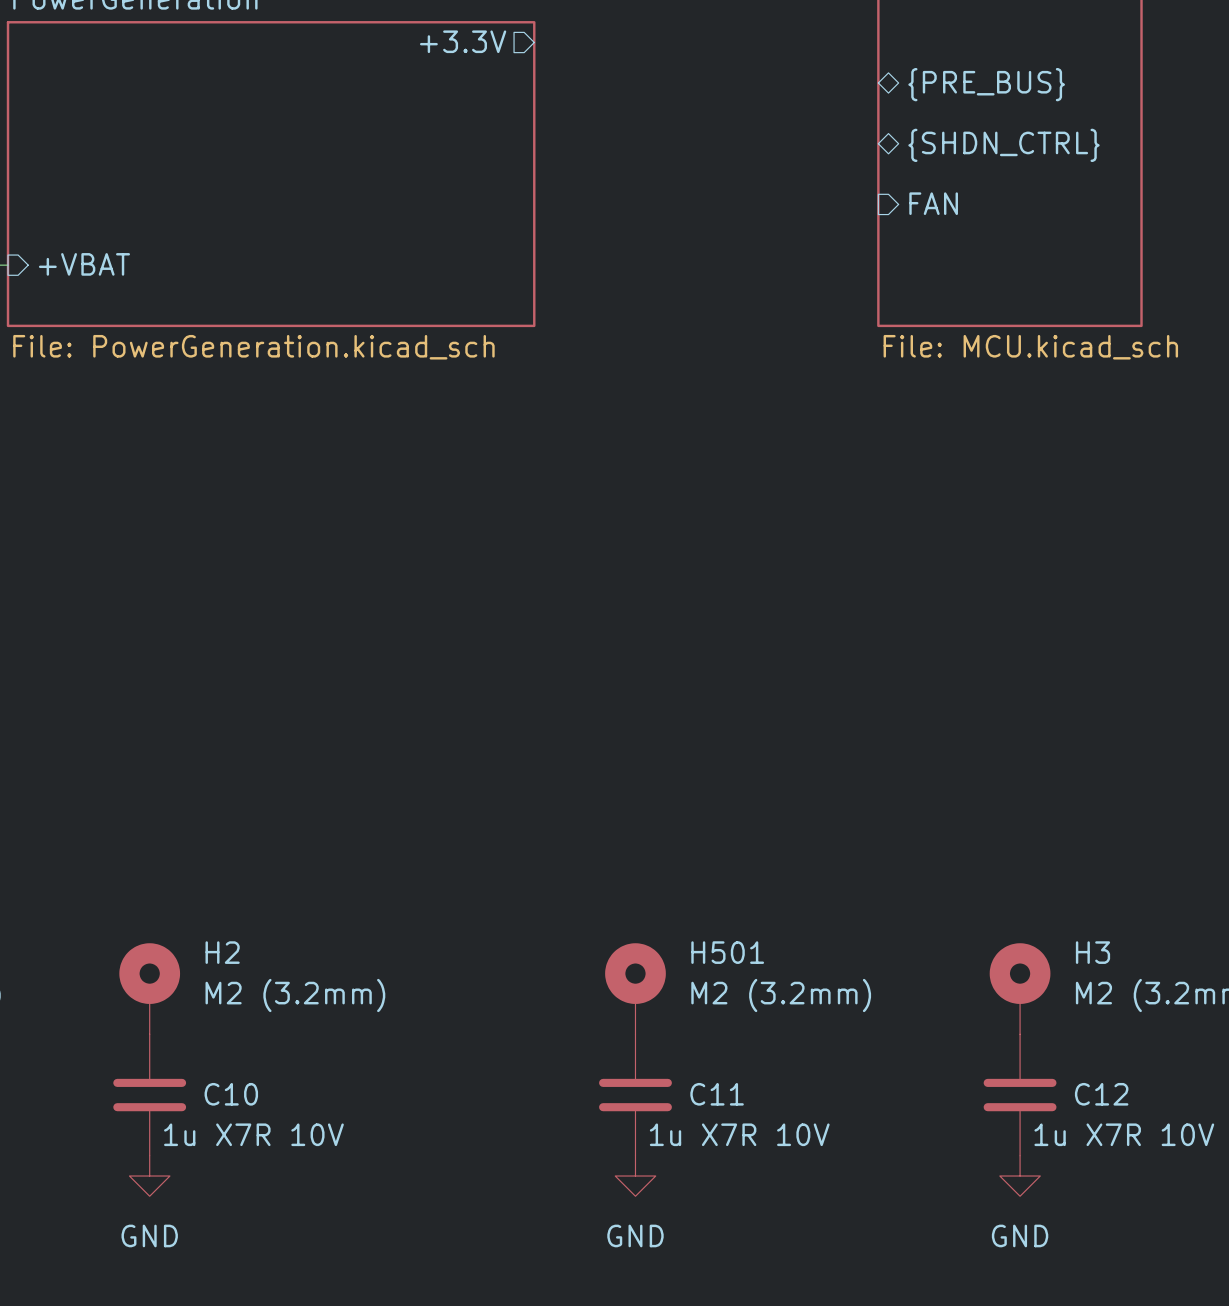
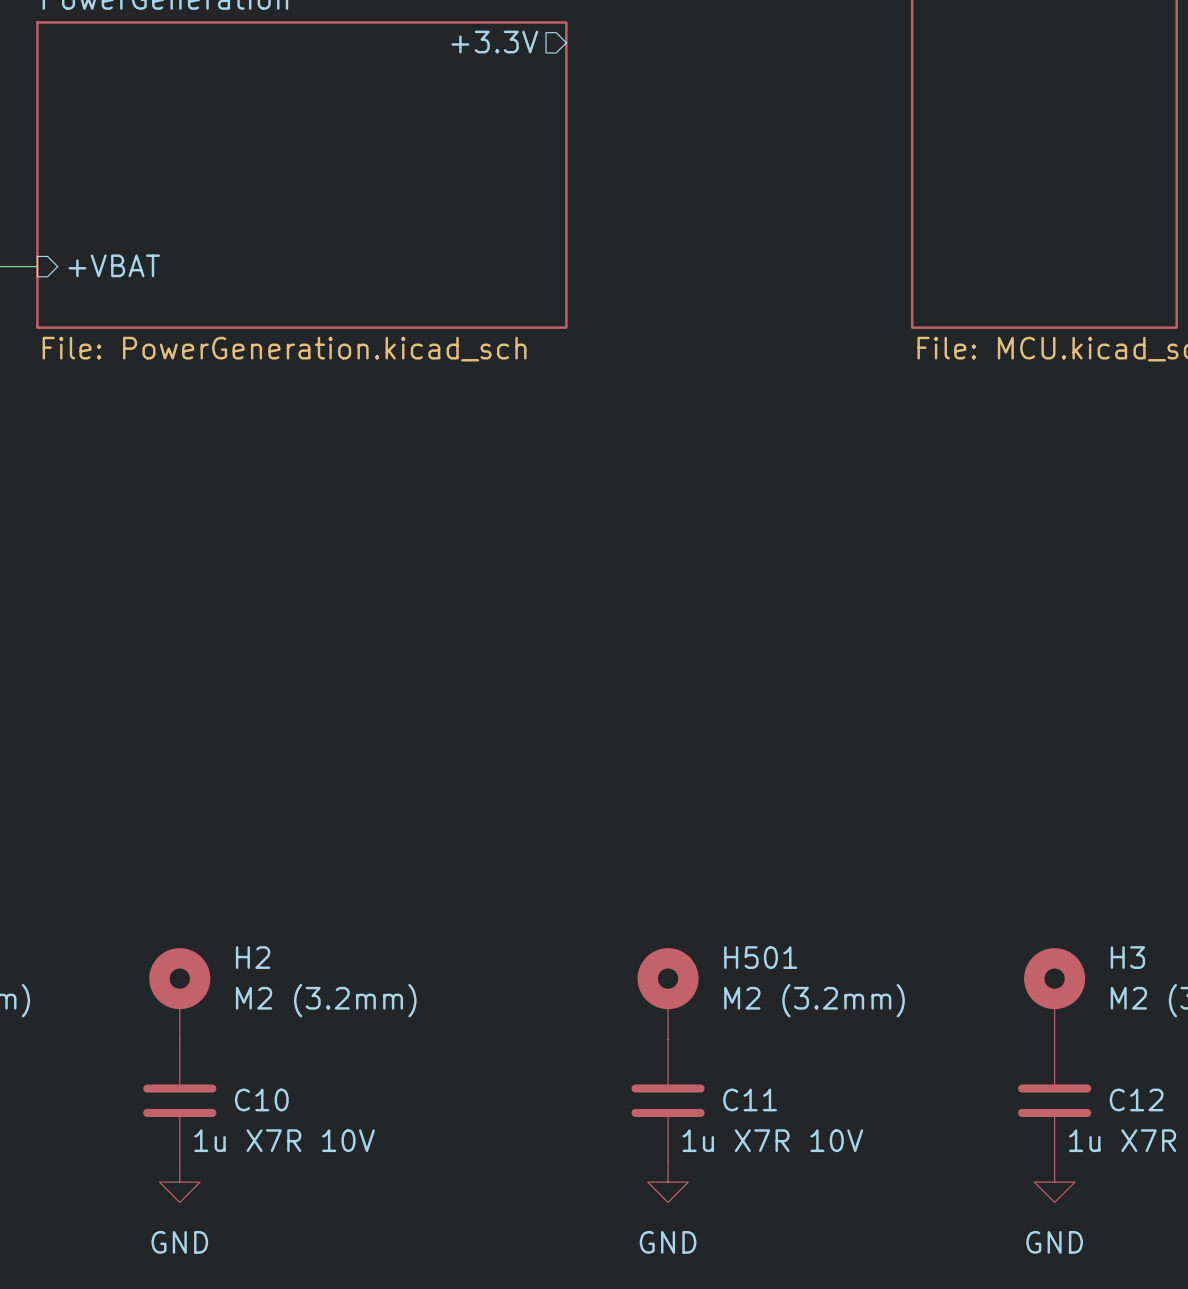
sheet pin: {PRE_BUS} (986, 84) -> none
sheet pin: {SHDN_CTRL} (1003, 145) -> none
sheet pin: FAN (933, 203) -> none

